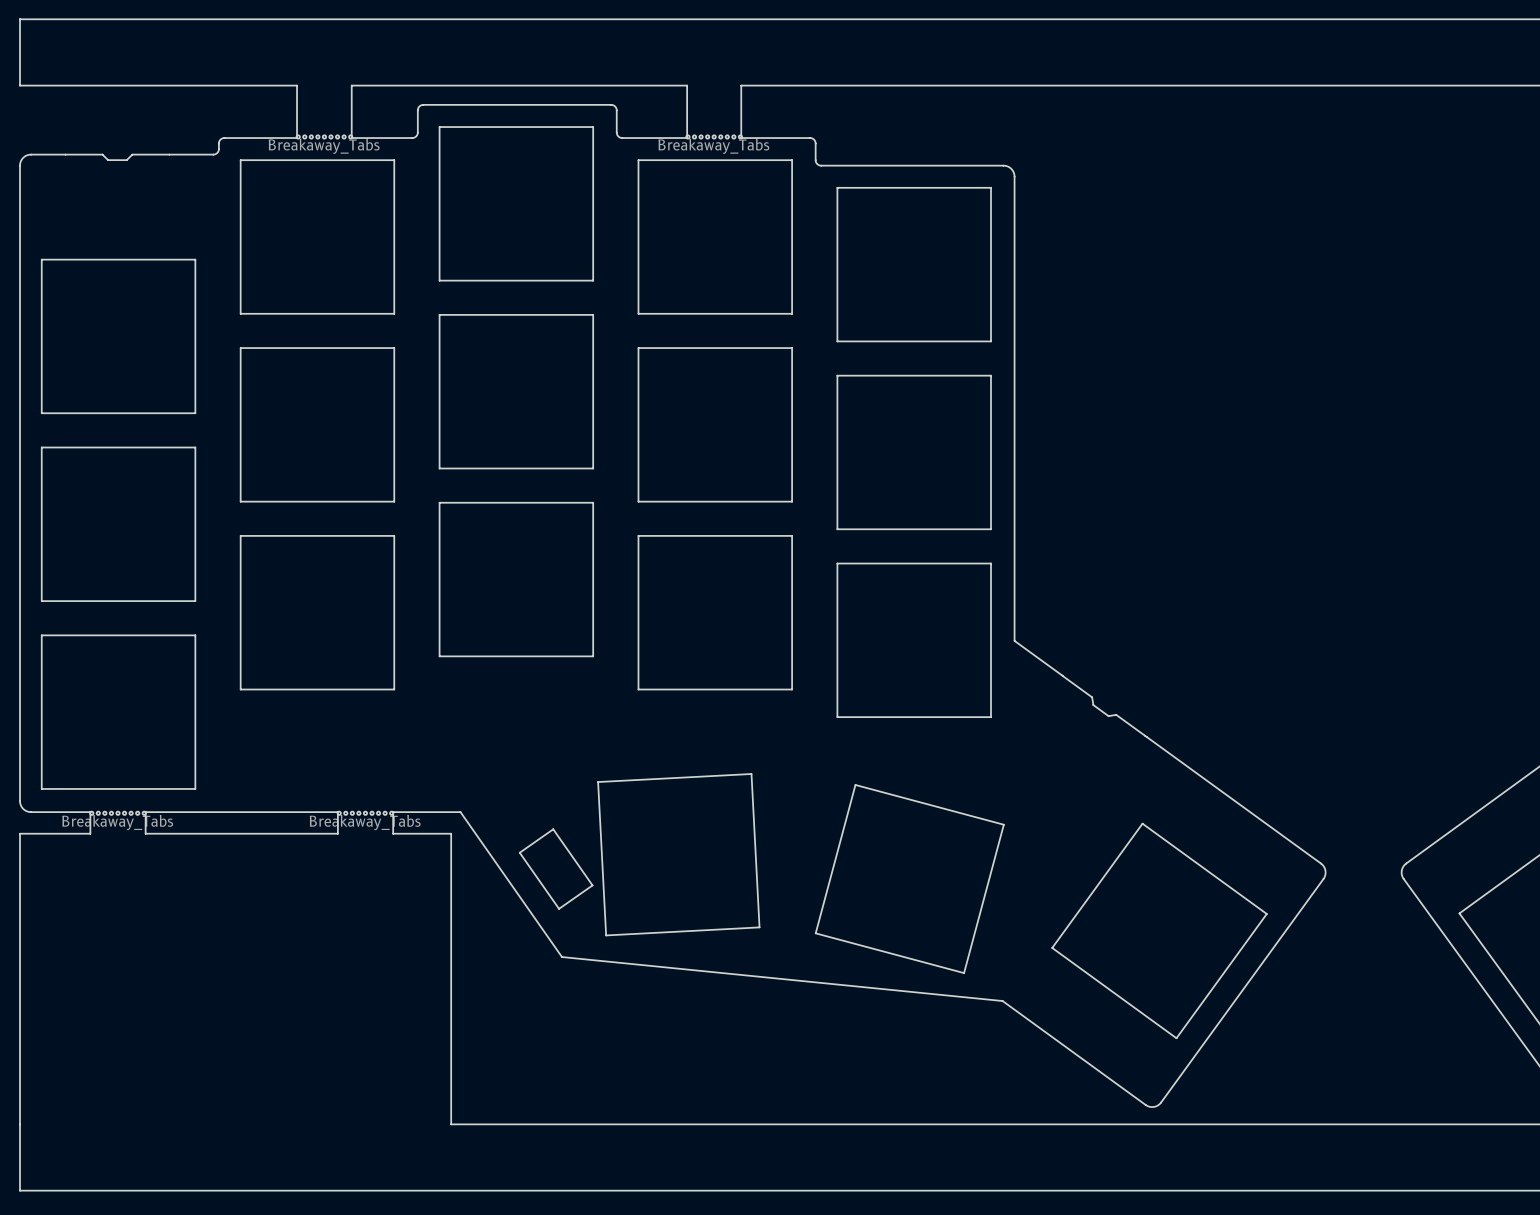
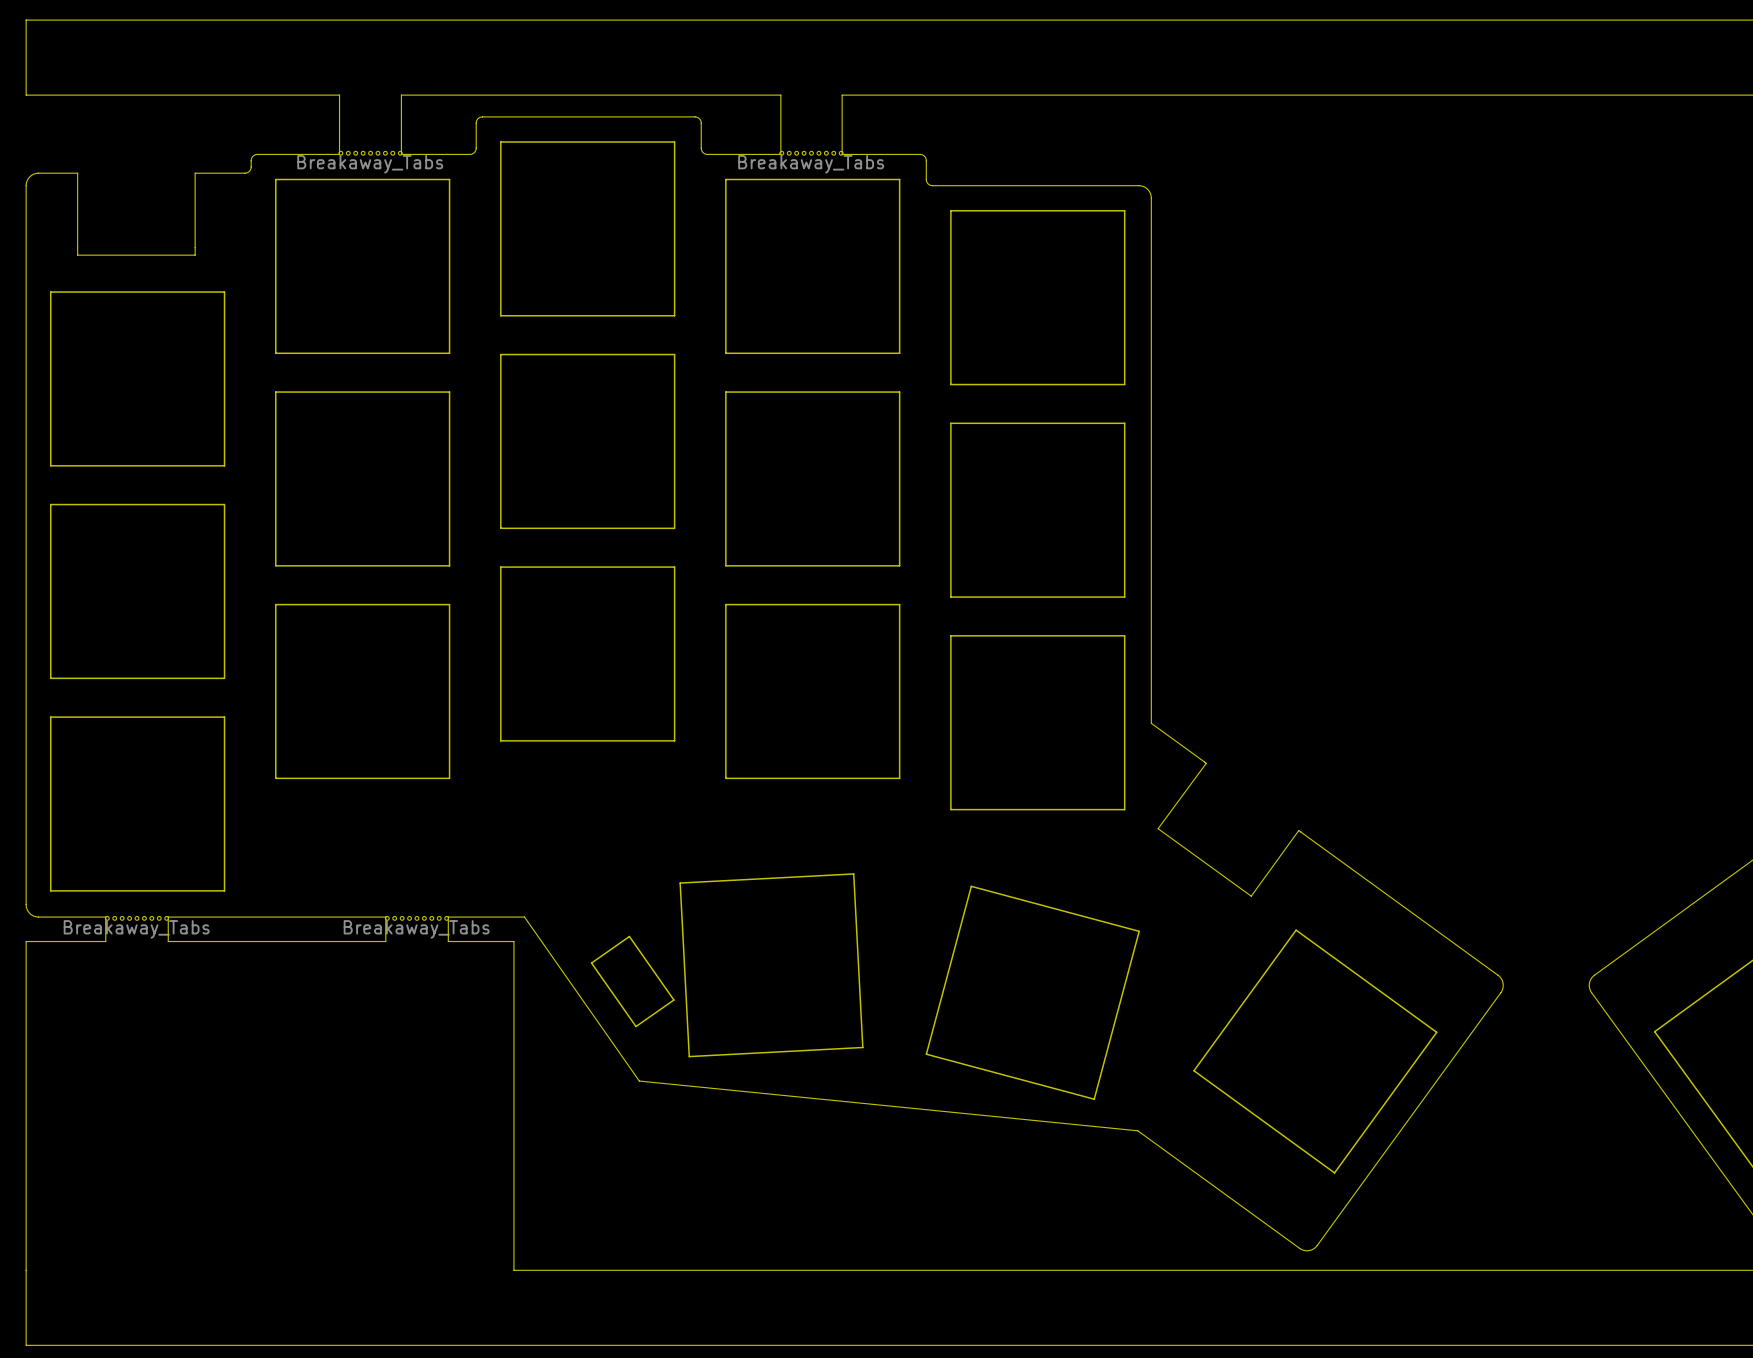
board edge: (65, 154) (102, 154) (108, 160) (126, 160) (132, 154) (169, 154) -> (77, 173) (77, 255) (195, 255) (195, 173)
board edge: (1063, 676) (1092, 697) (1093, 705) (1108, 716) (1116, 714) (1144, 735) -> (1206, 763) (1158, 828) (1251, 896) (1298, 830)

